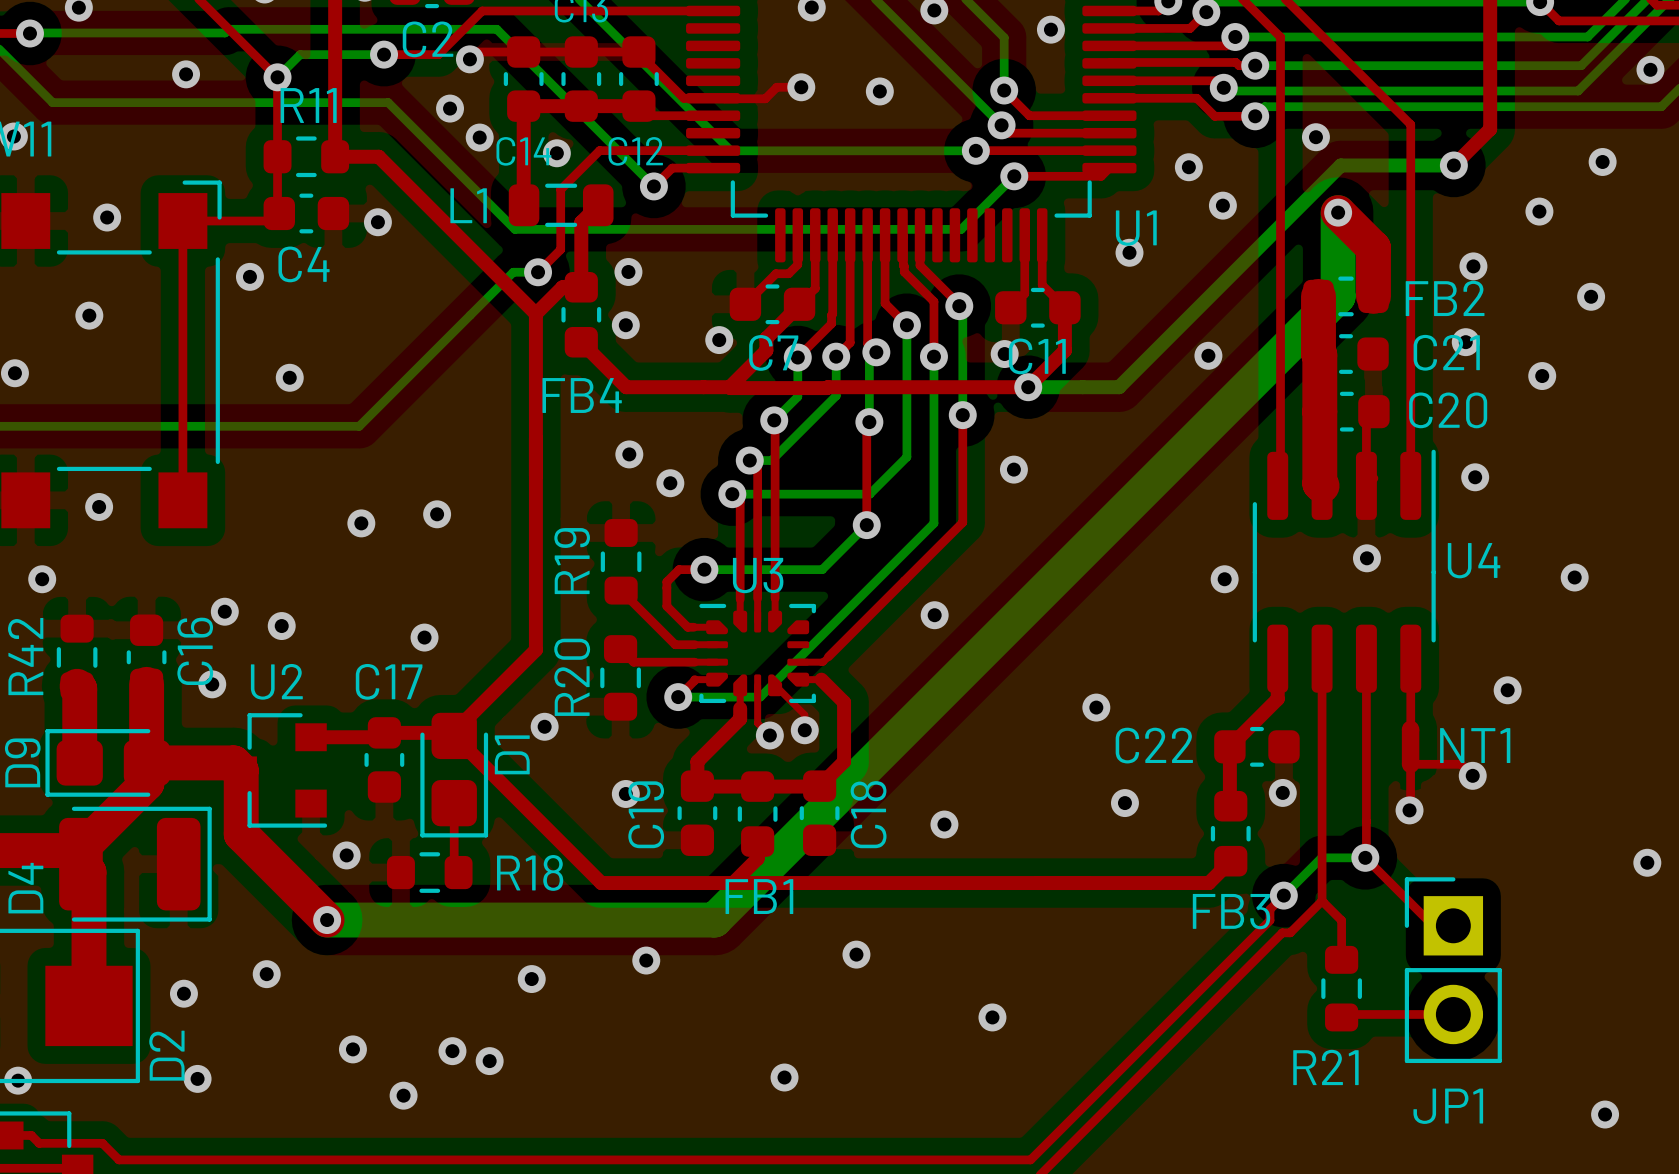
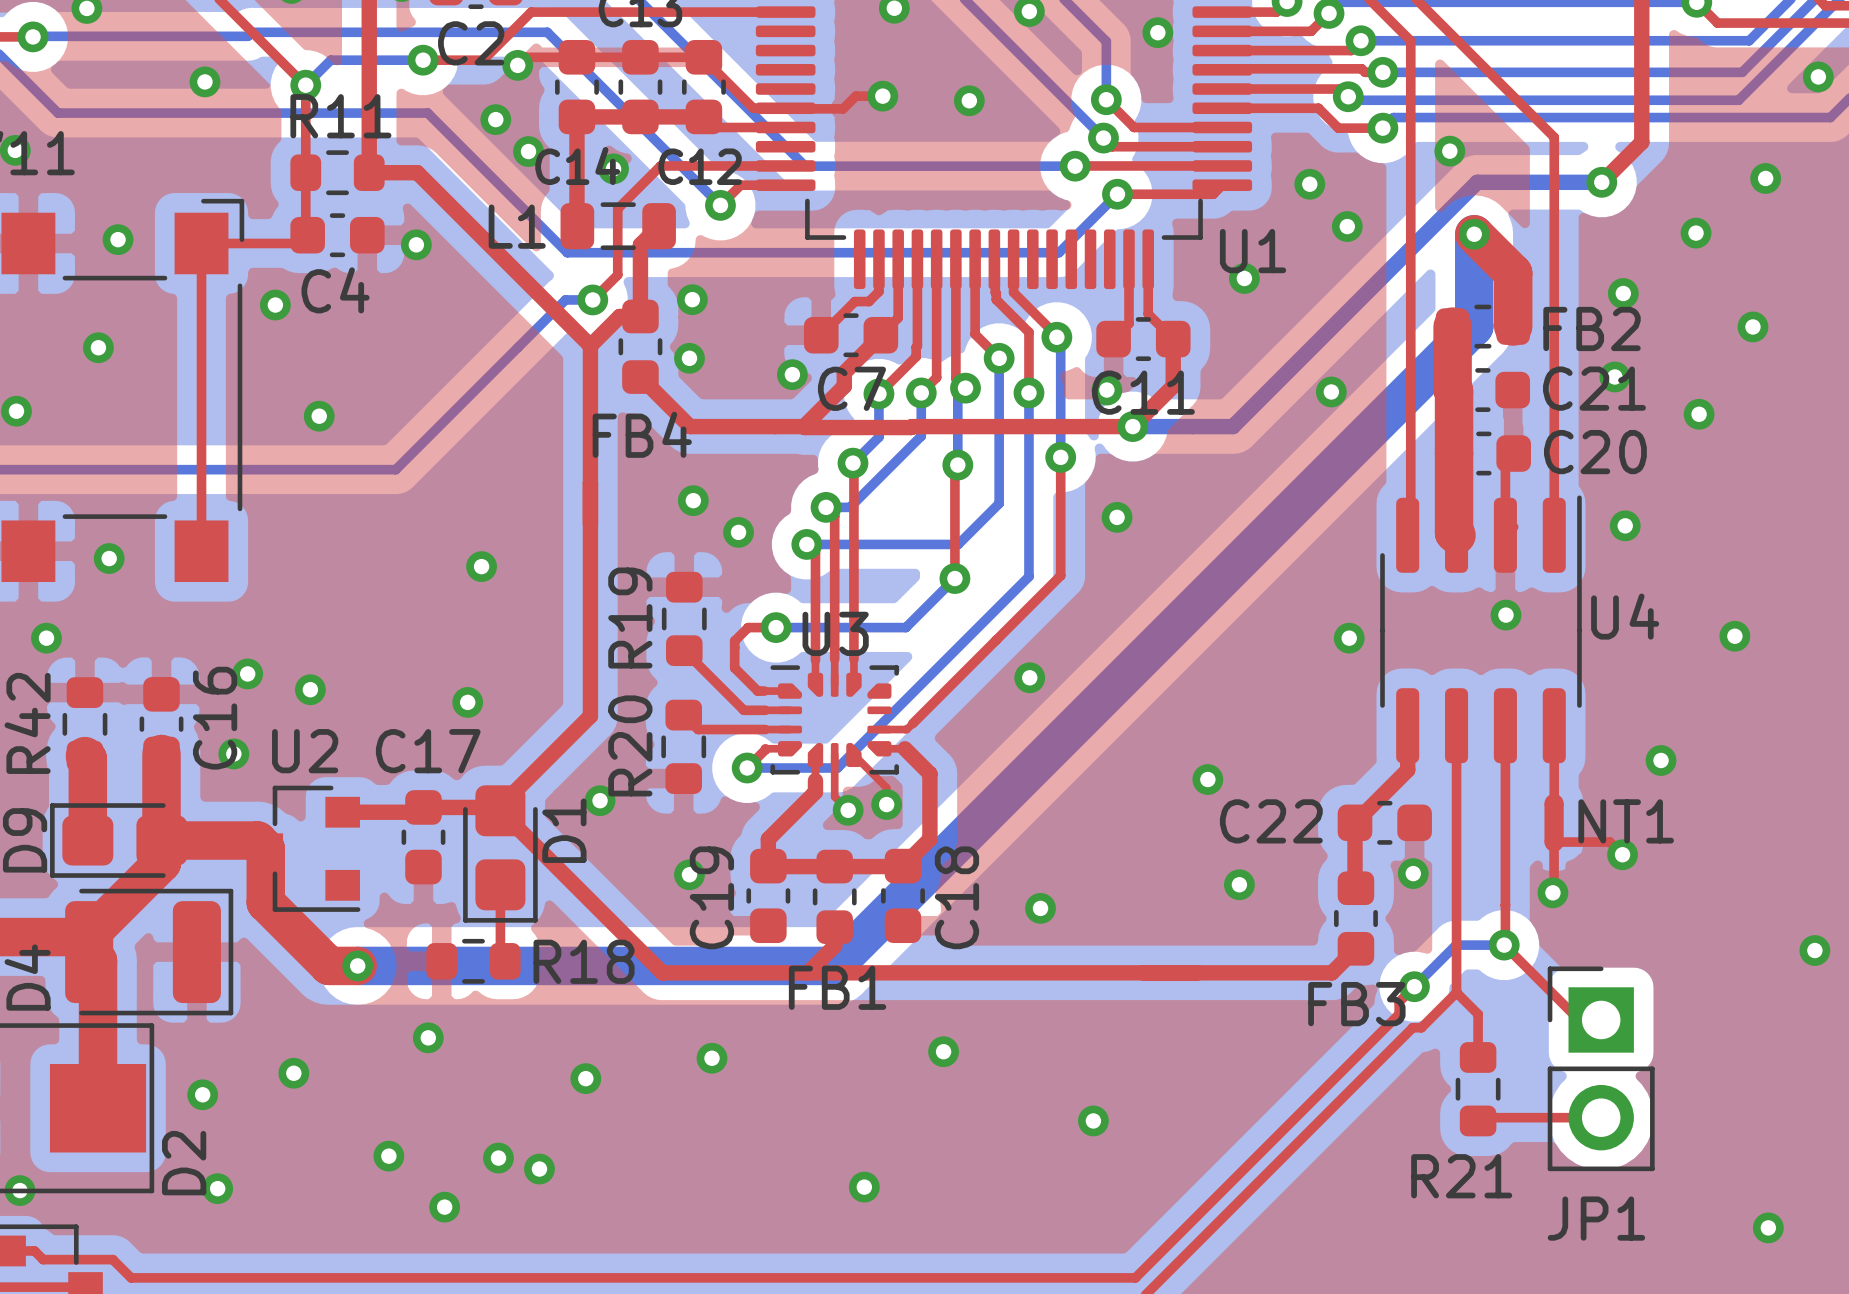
via: (361, 523) -> none
top track: (241, 819) (241, 834) (327, 920) -> (265, 902) (329, 965) (357, 965)
via position: (346, 855) -> (357, 965)
bottom track: (757, 876) (714, 920) (327, 920) -> (834, 965) (357, 965)
via: (327, 920) -> none
via: none -> (428, 1037)

